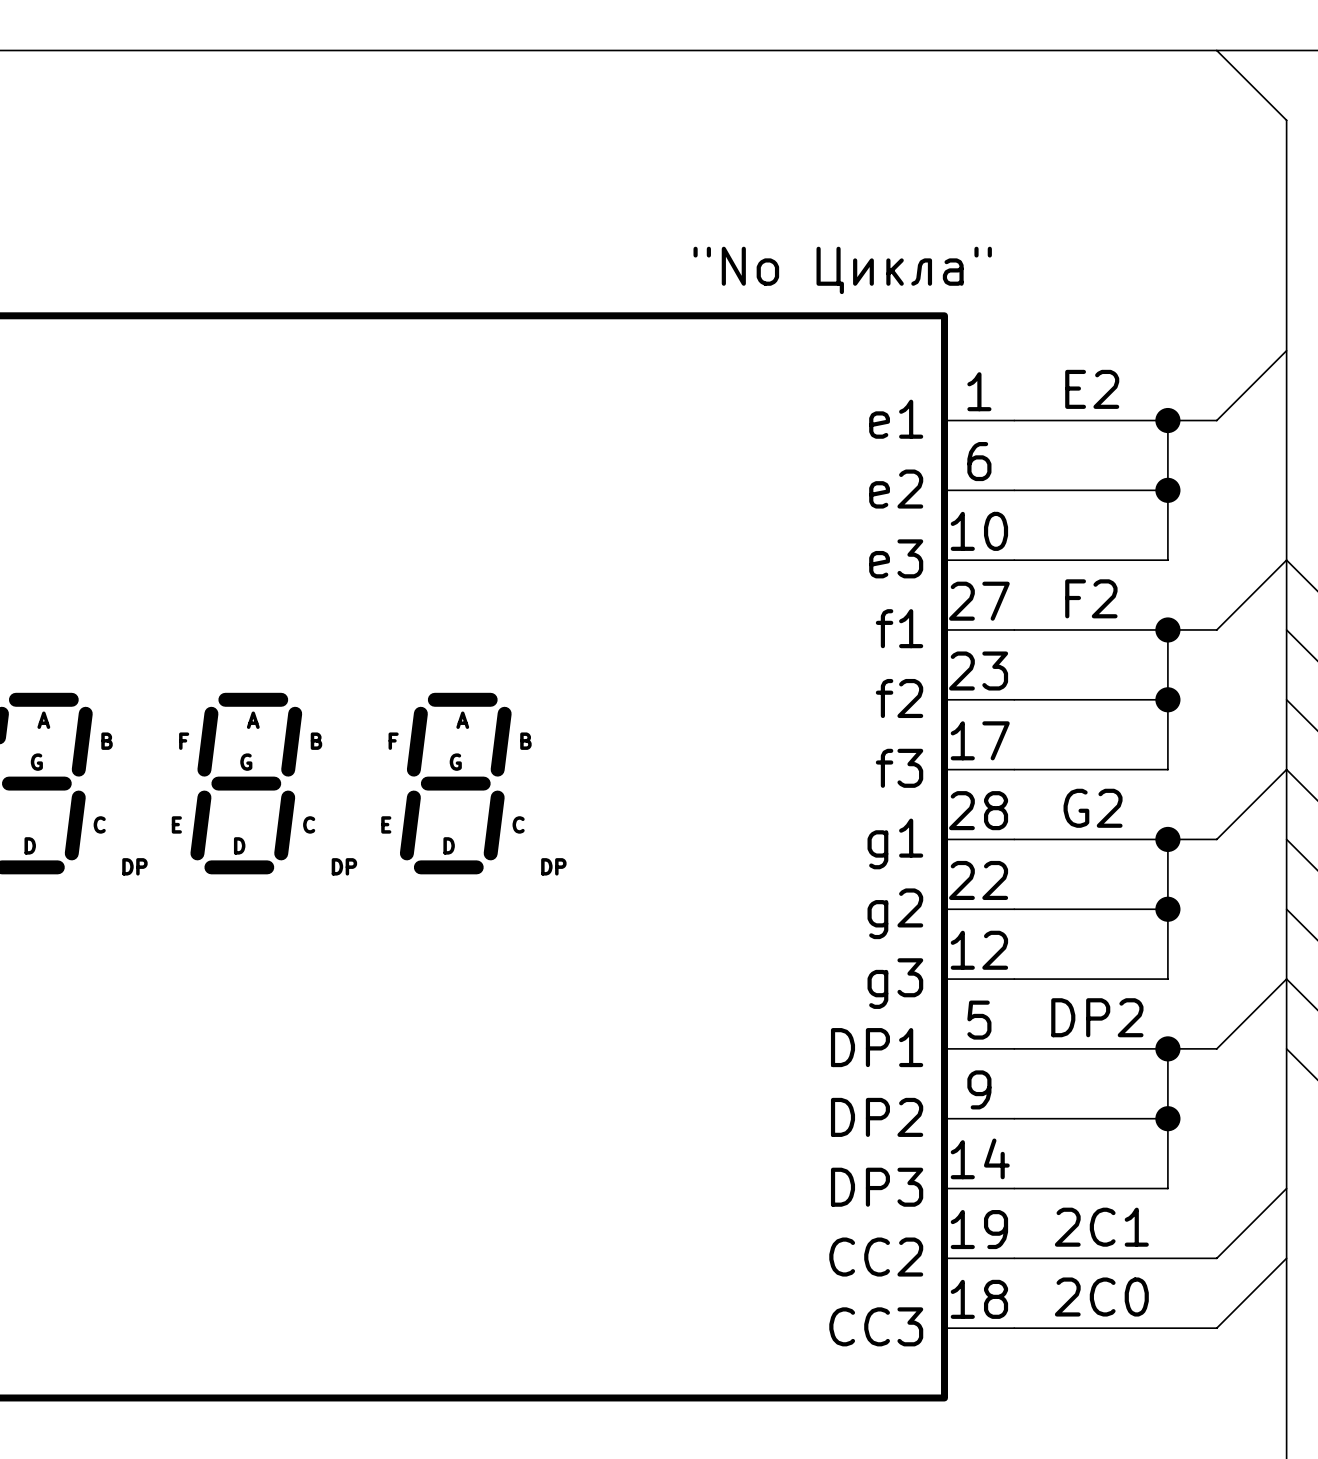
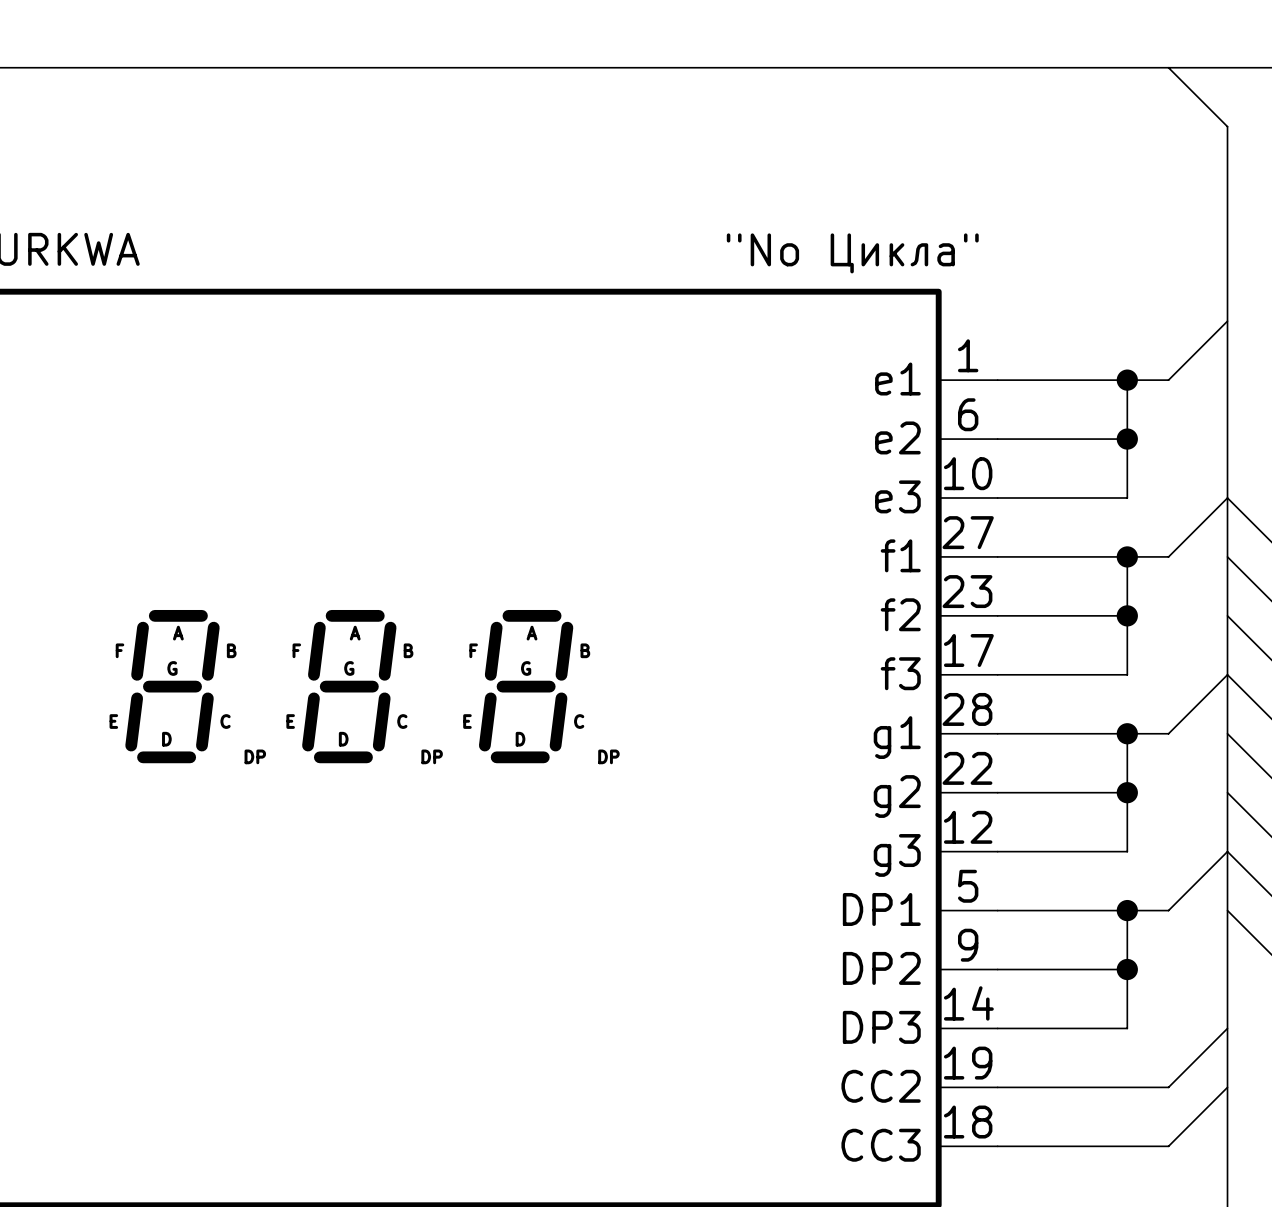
label: E2 (1092, 389) -> none
label: F2 (1091, 598) -> none
label: G2 (1093, 808) -> none
label: DP2 (1097, 1017) -> none
label: 2C1 (1101, 1227) -> none
label: 2C0 (1101, 1297) -> none

